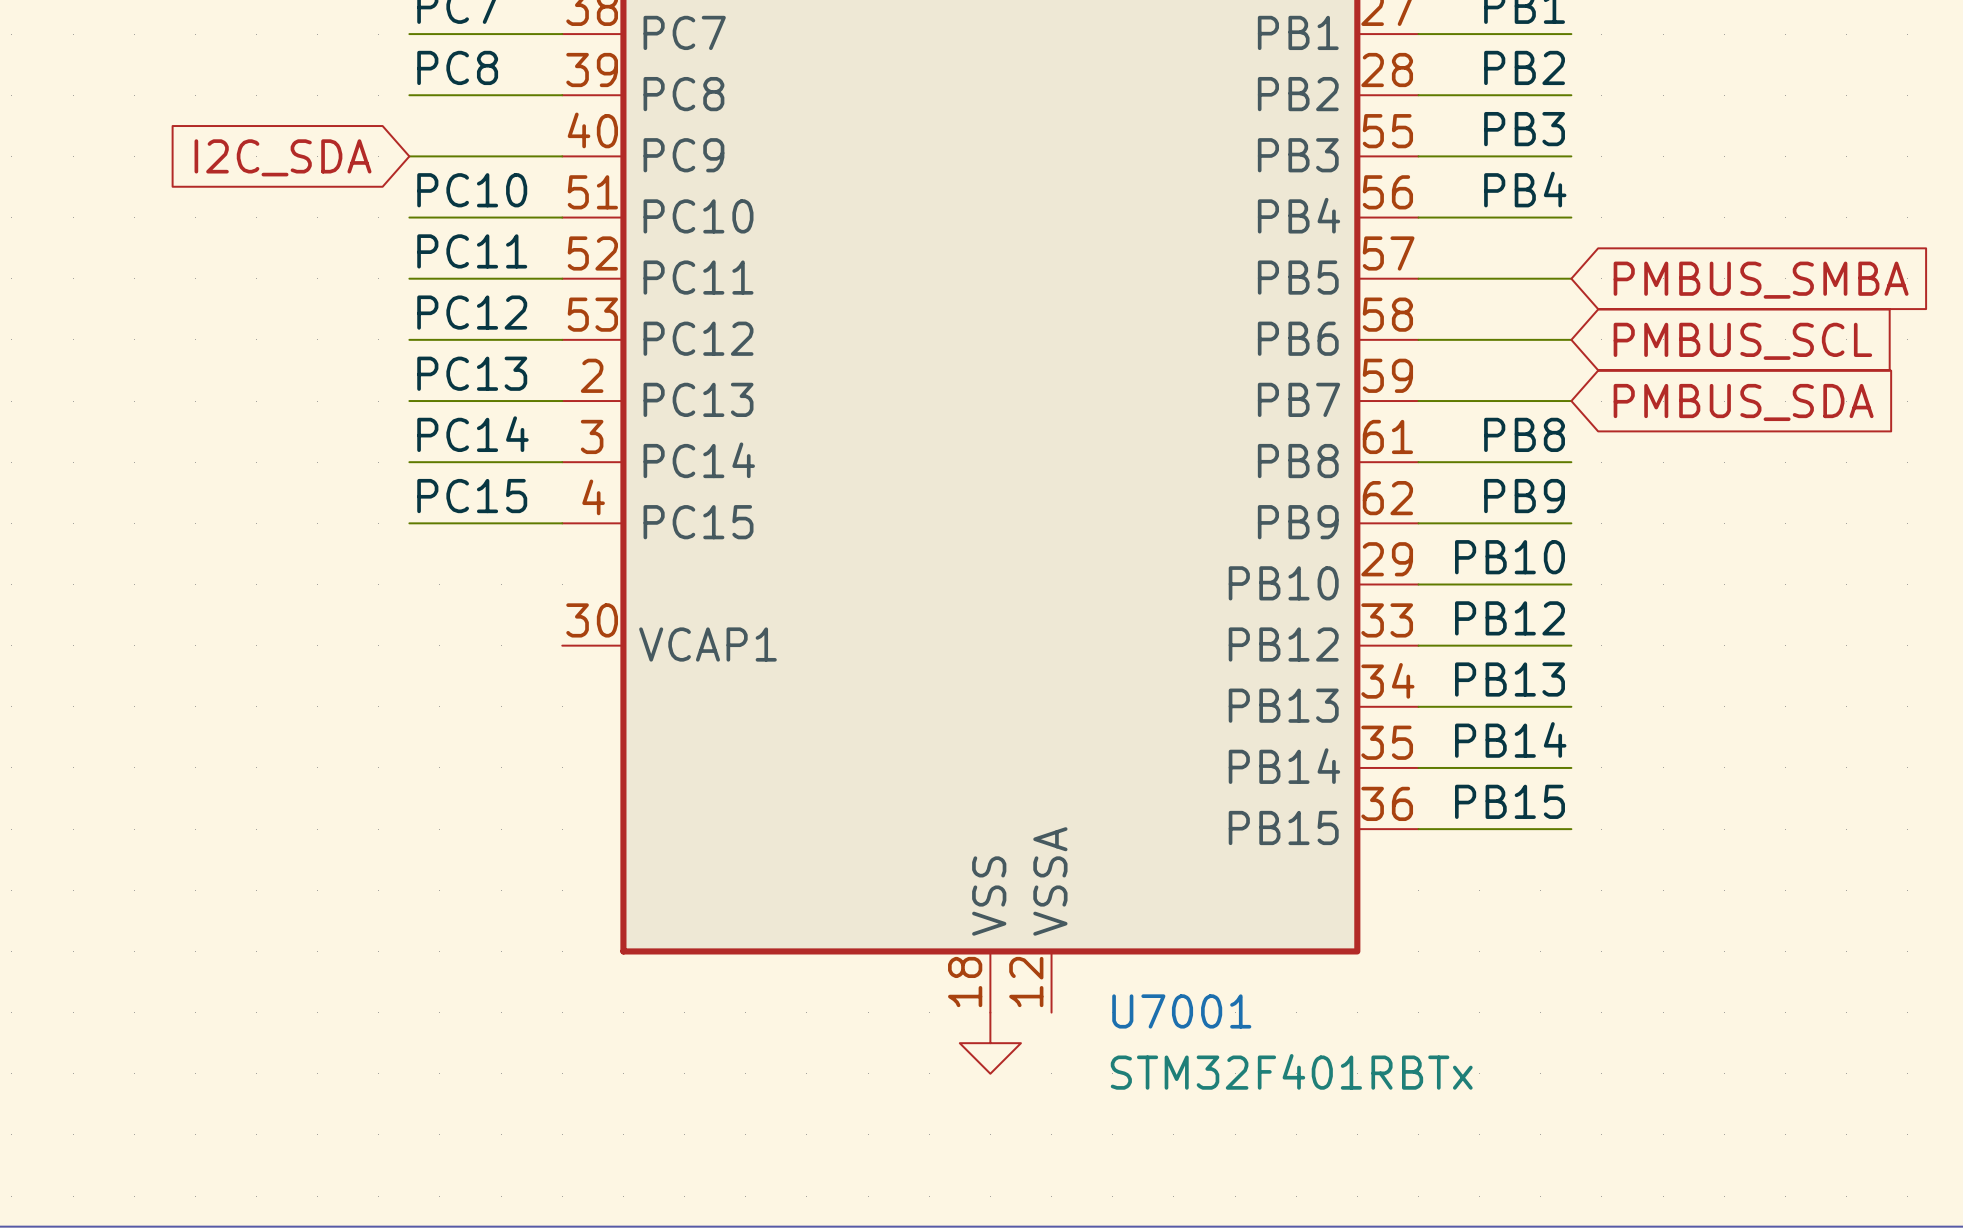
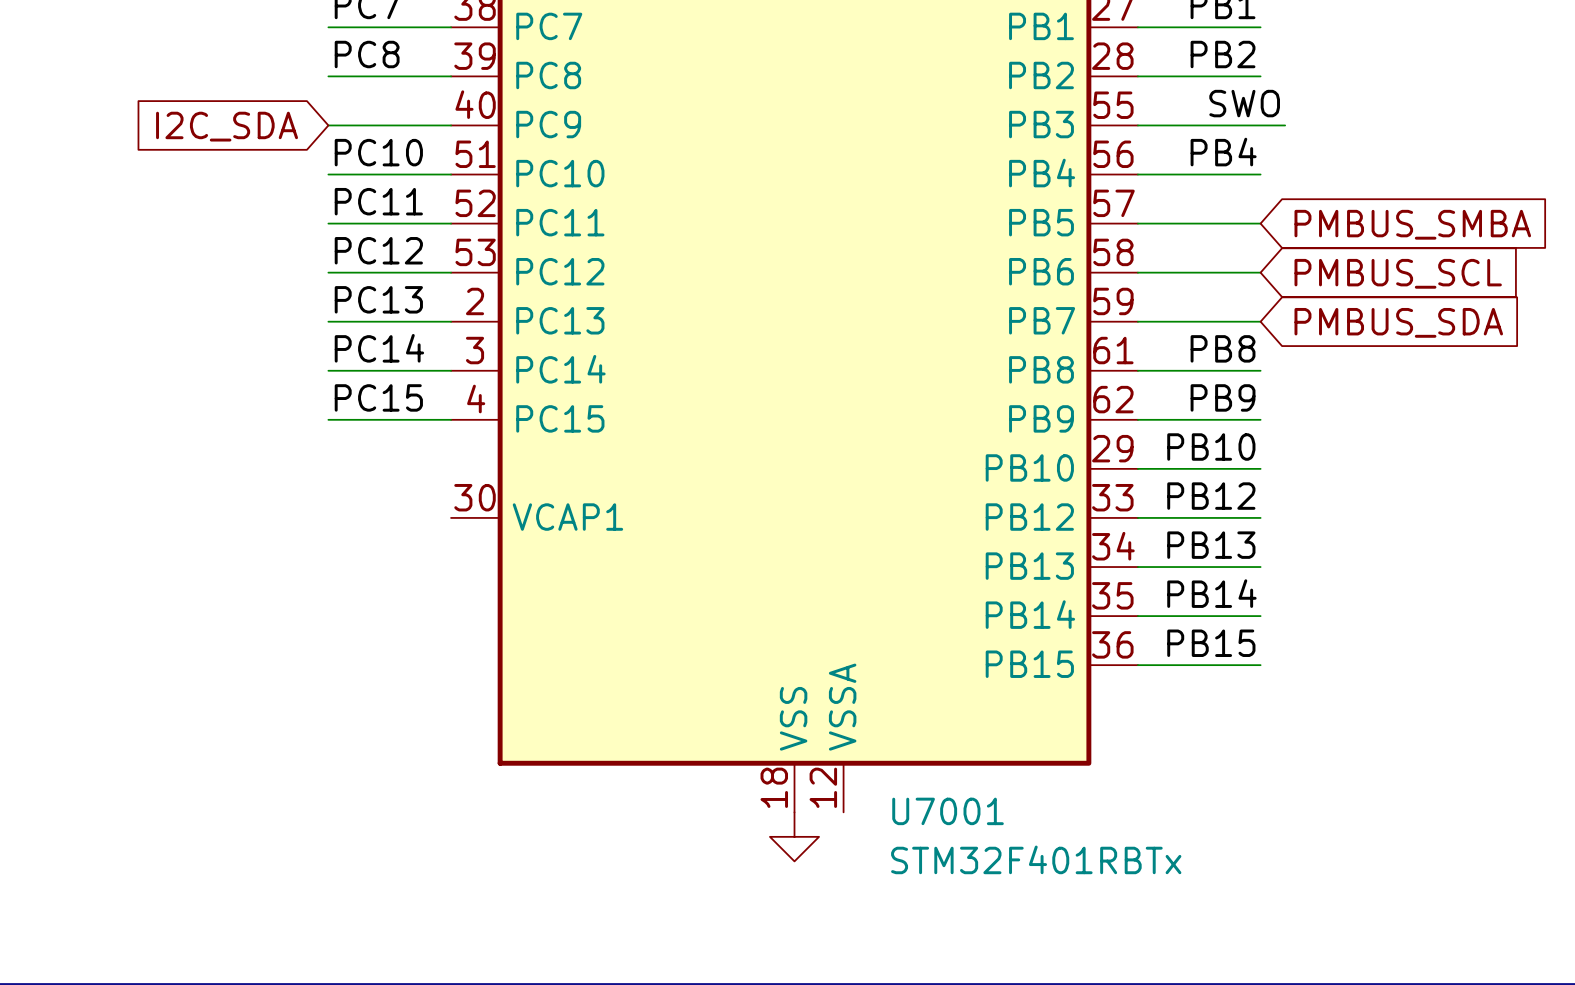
label: PB3 (1524, 129) -> none
label: none -> SWO (1244, 103)
wire: none -> (1260, 125) (1285, 125)

